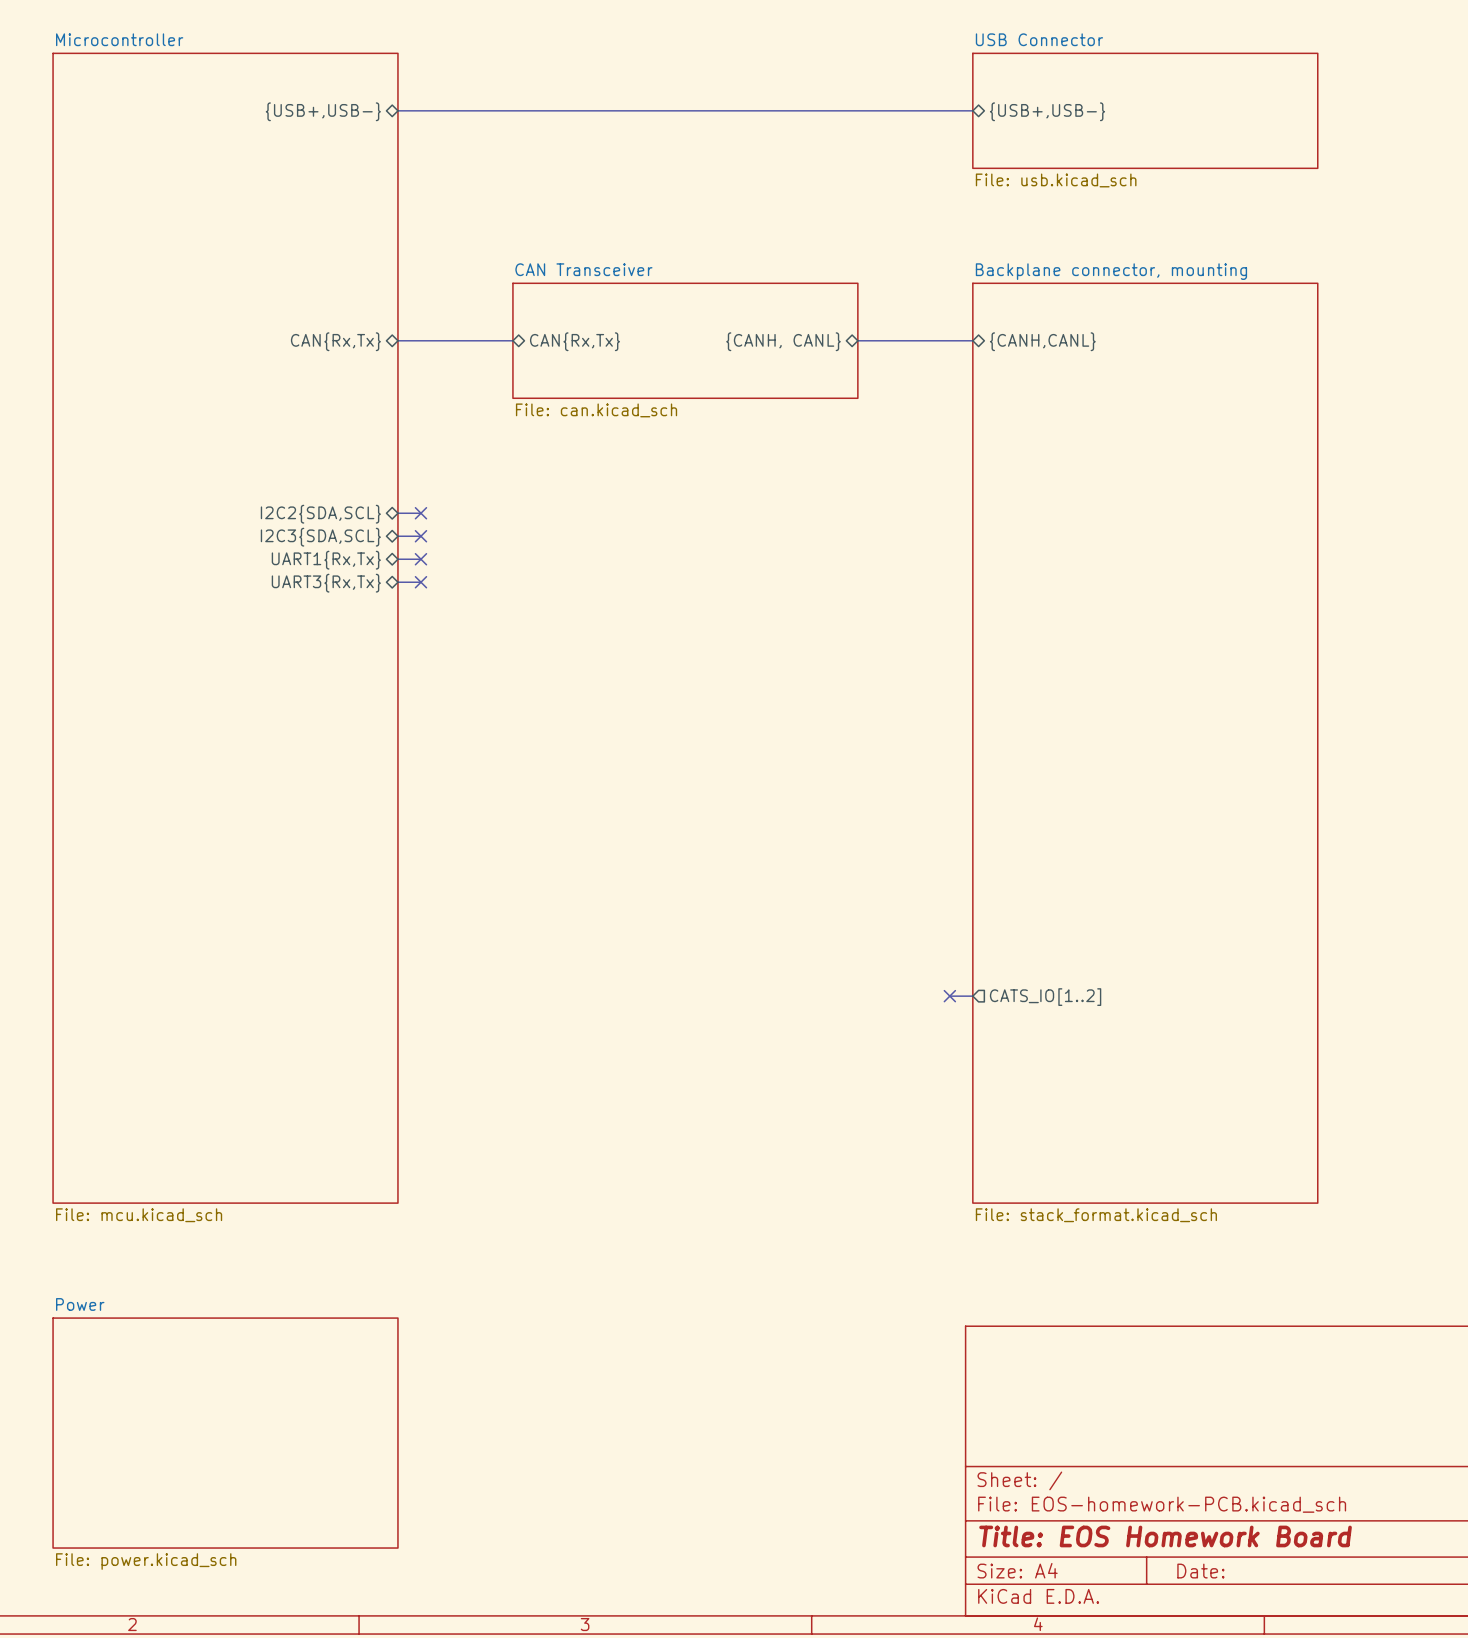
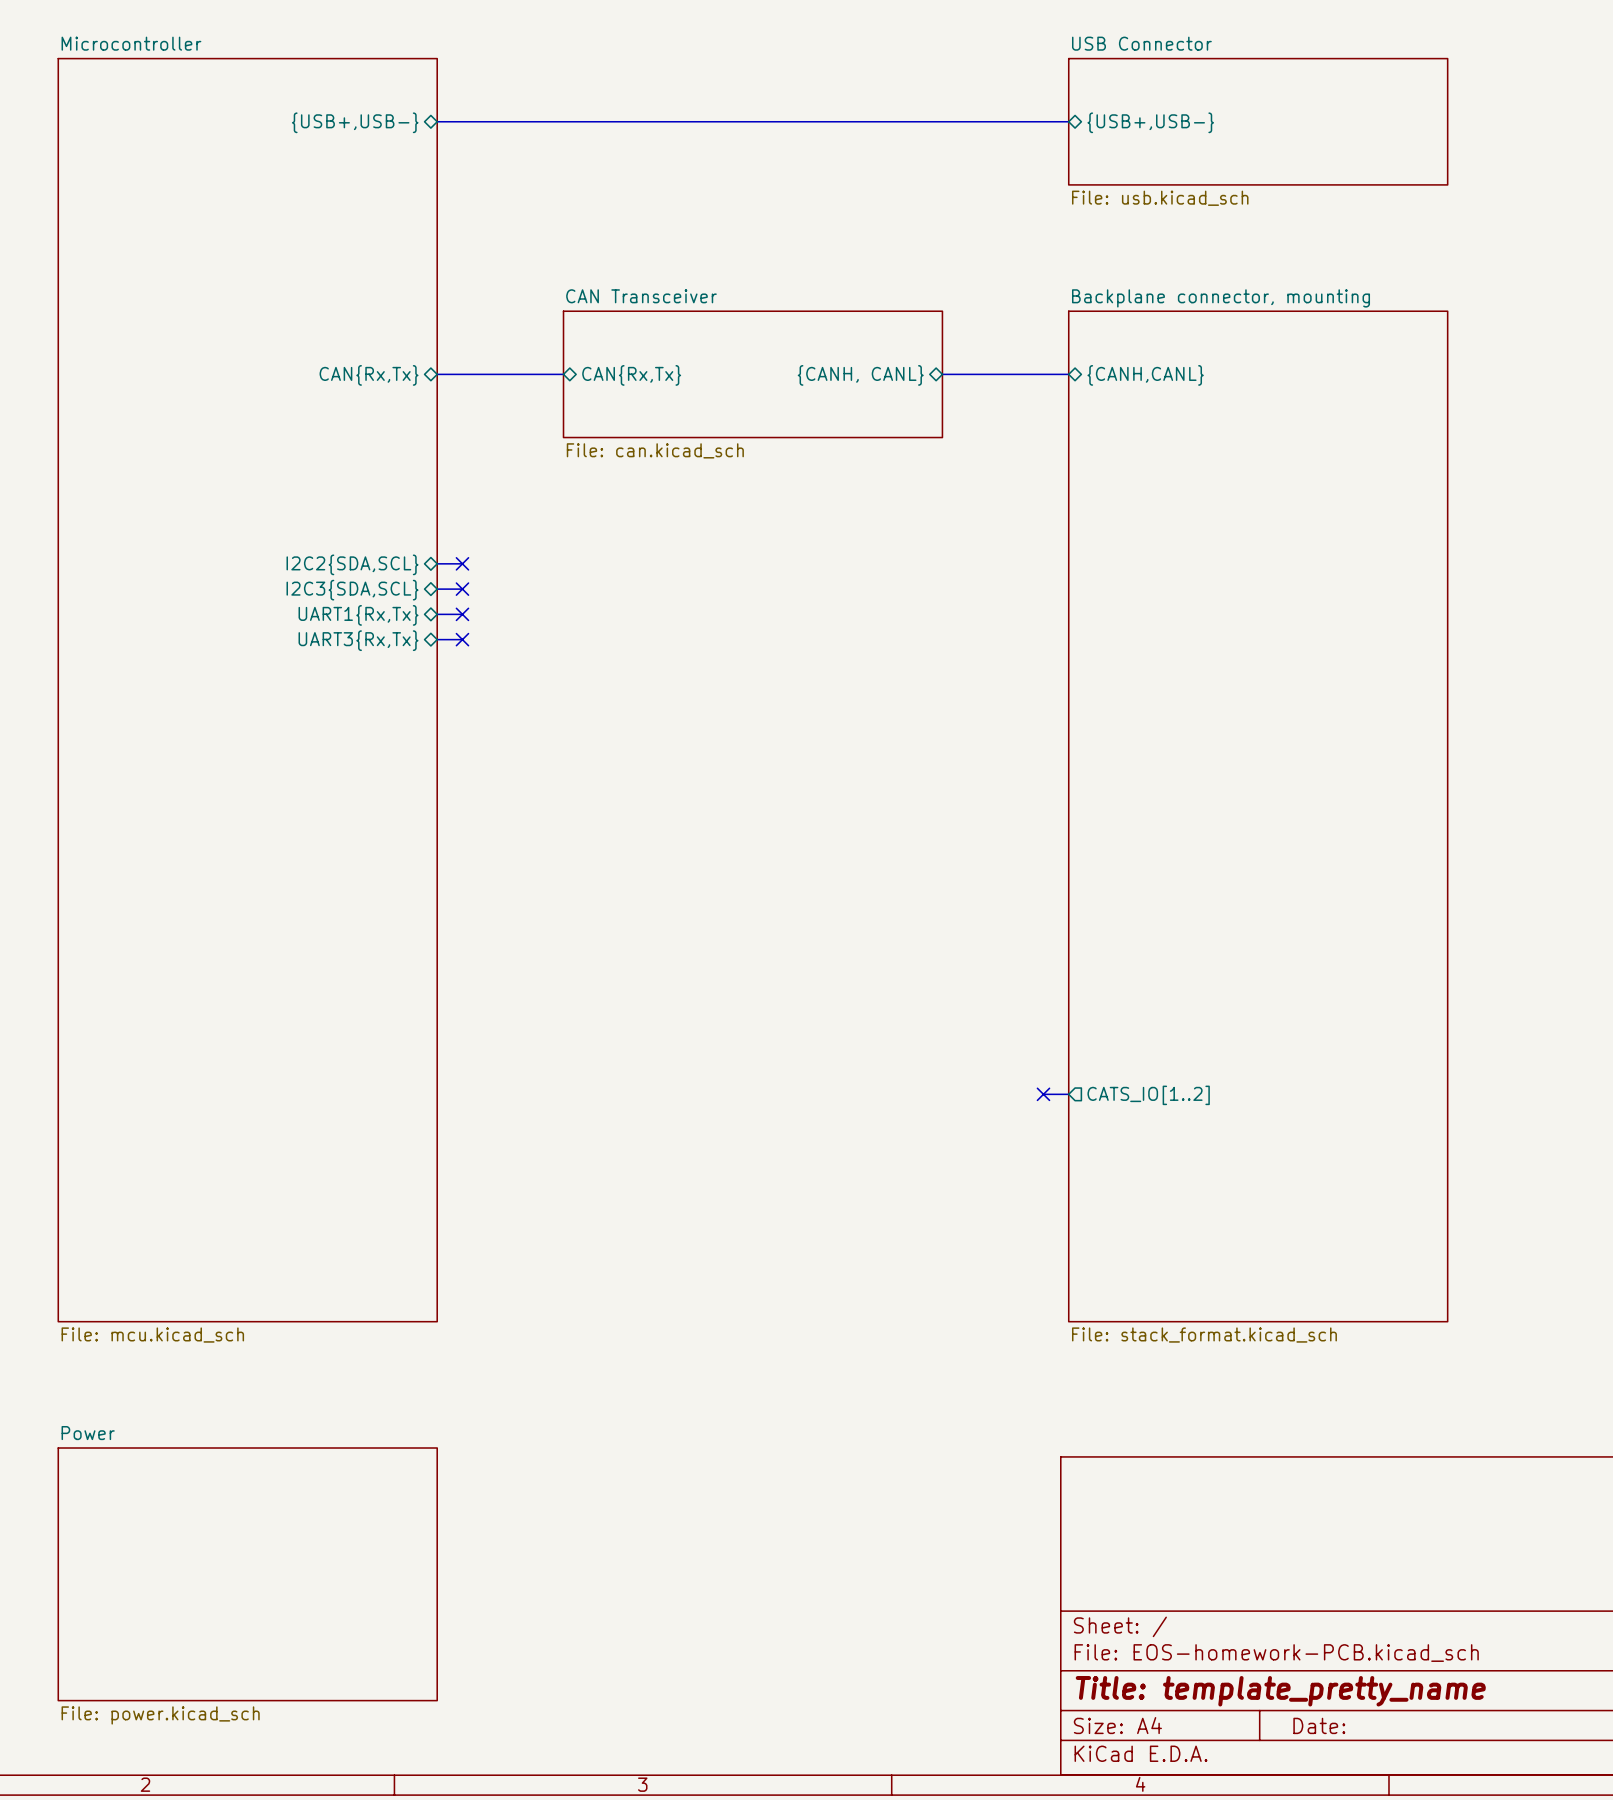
title block: Title: EOS Homework Board (1165, 1536) -> Title: template_pretty_name (1280, 1691)

